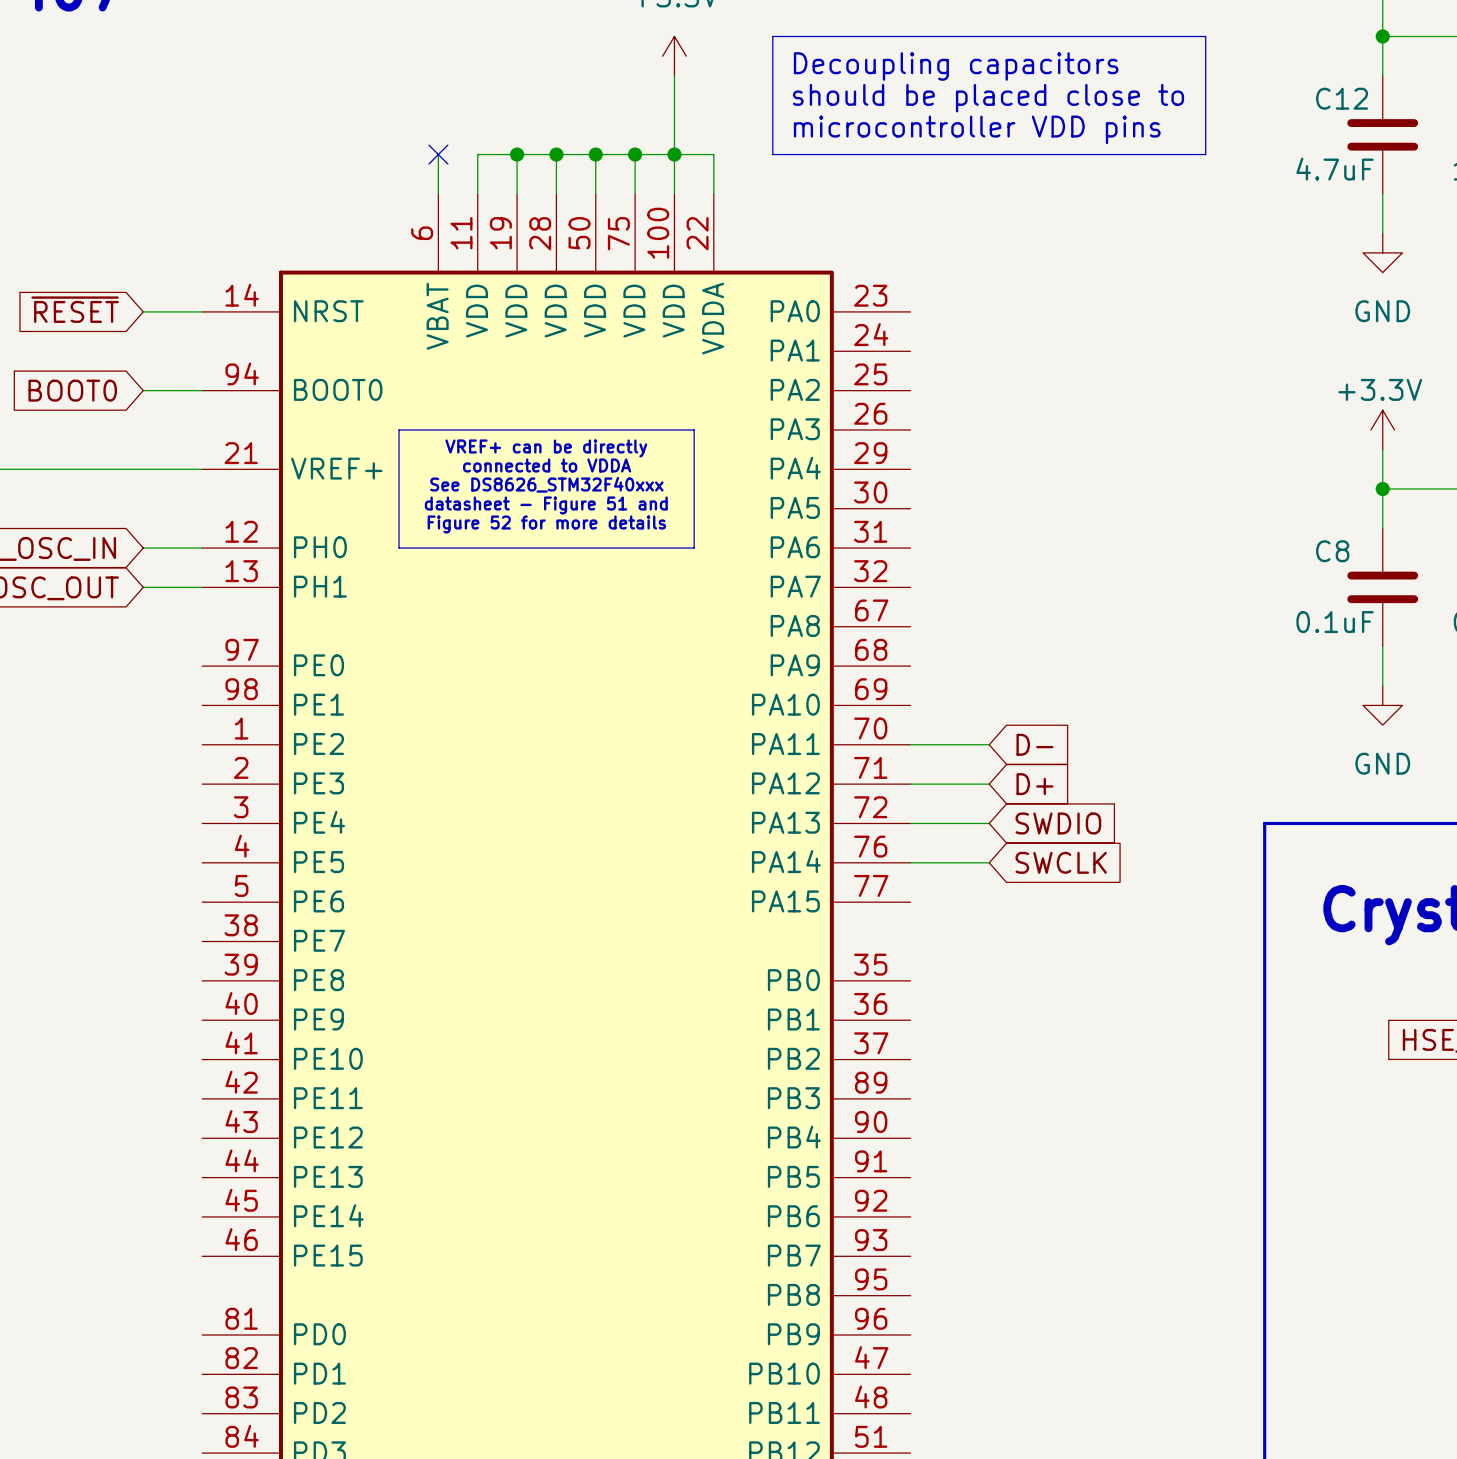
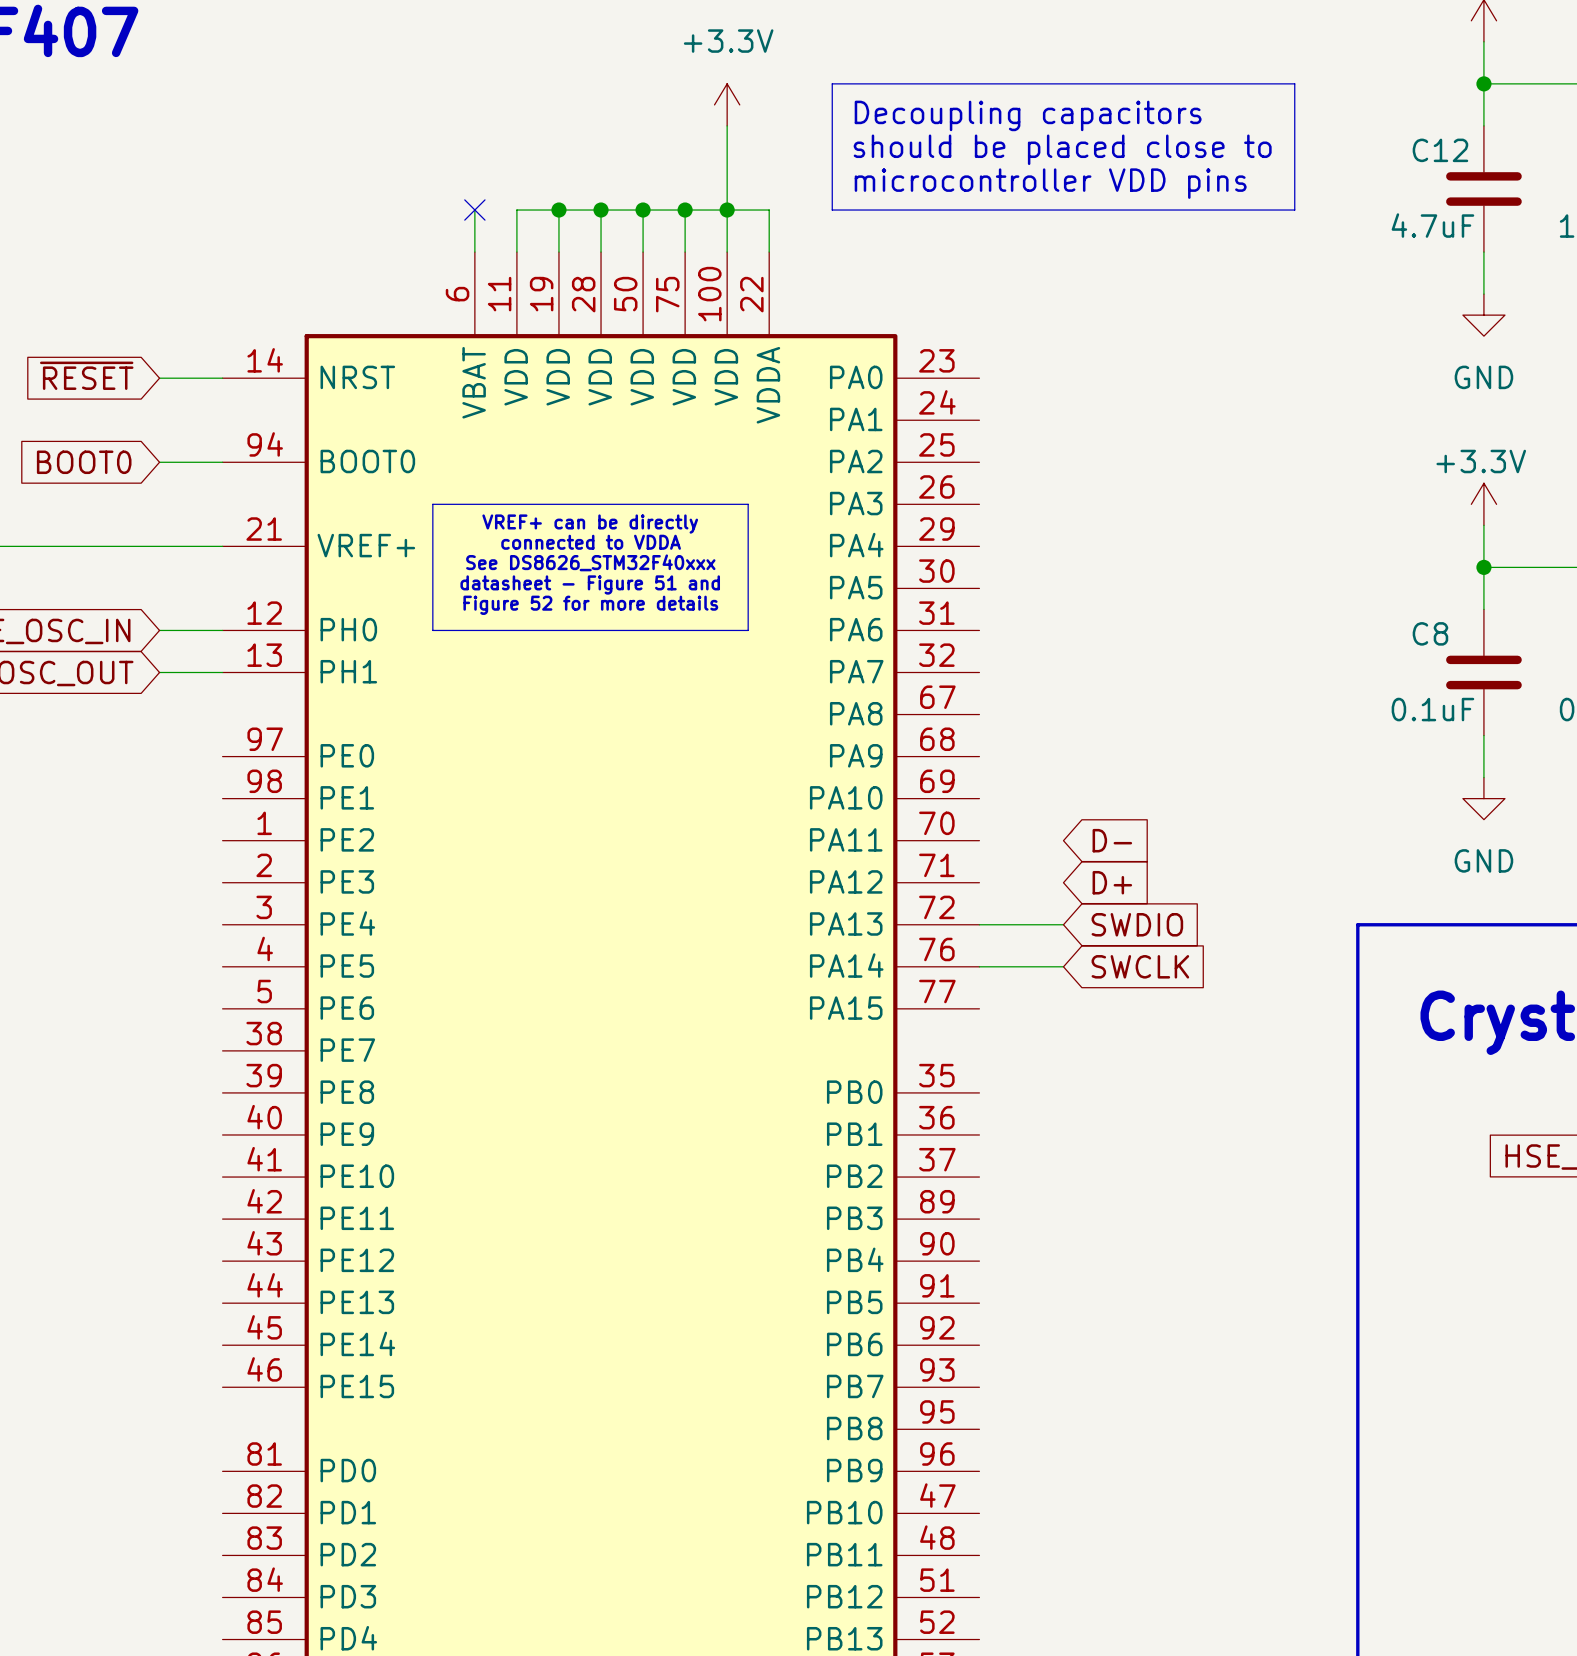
wire: (910, 744) (989, 744) -> none
wire: (910, 784) (989, 784) -> none

